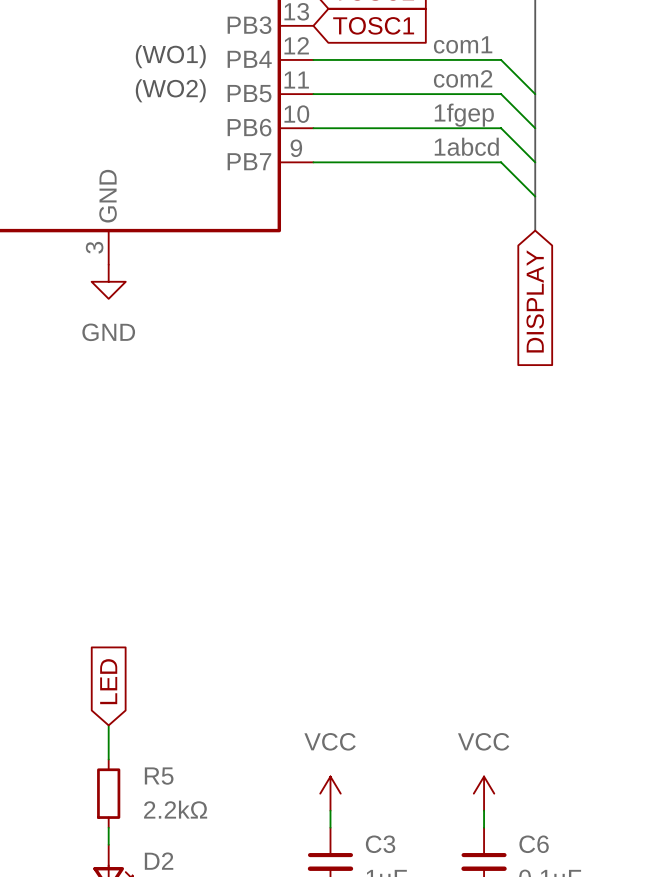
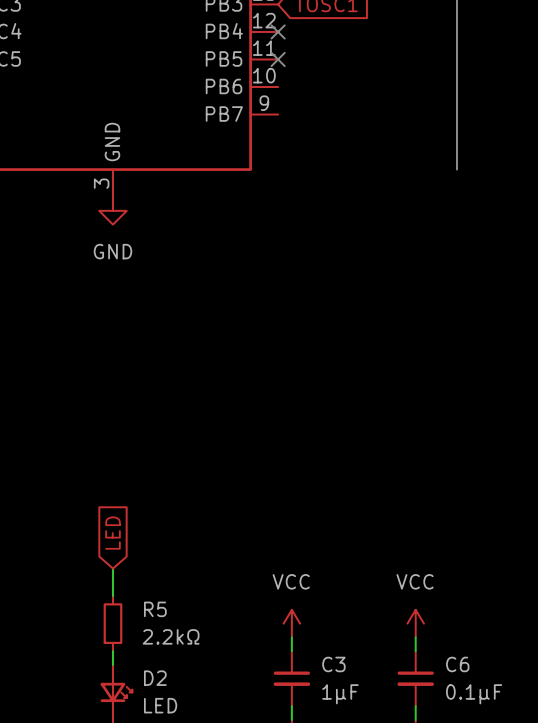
label: com1 (463, 44) -> none
text: (WO1) (170, 56) -> none
wire: (313, 59) (501, 59) (535, 94) -> none
no-connect mark: none -> (278, 31)
label: com2 (463, 78) -> none
text: (WO2) (170, 90) -> none
wire: (313, 94) (501, 94) (535, 128) -> none
no-connect mark: none -> (278, 59)
label: 1fgep (464, 115) -> none
wire: (313, 128) (501, 128) (535, 162) -> none
label: 1abcd (466, 146) -> none
wire: (313, 162) (501, 162) (535, 196) -> none
global label: DISPLAY (535, 301) -> none

